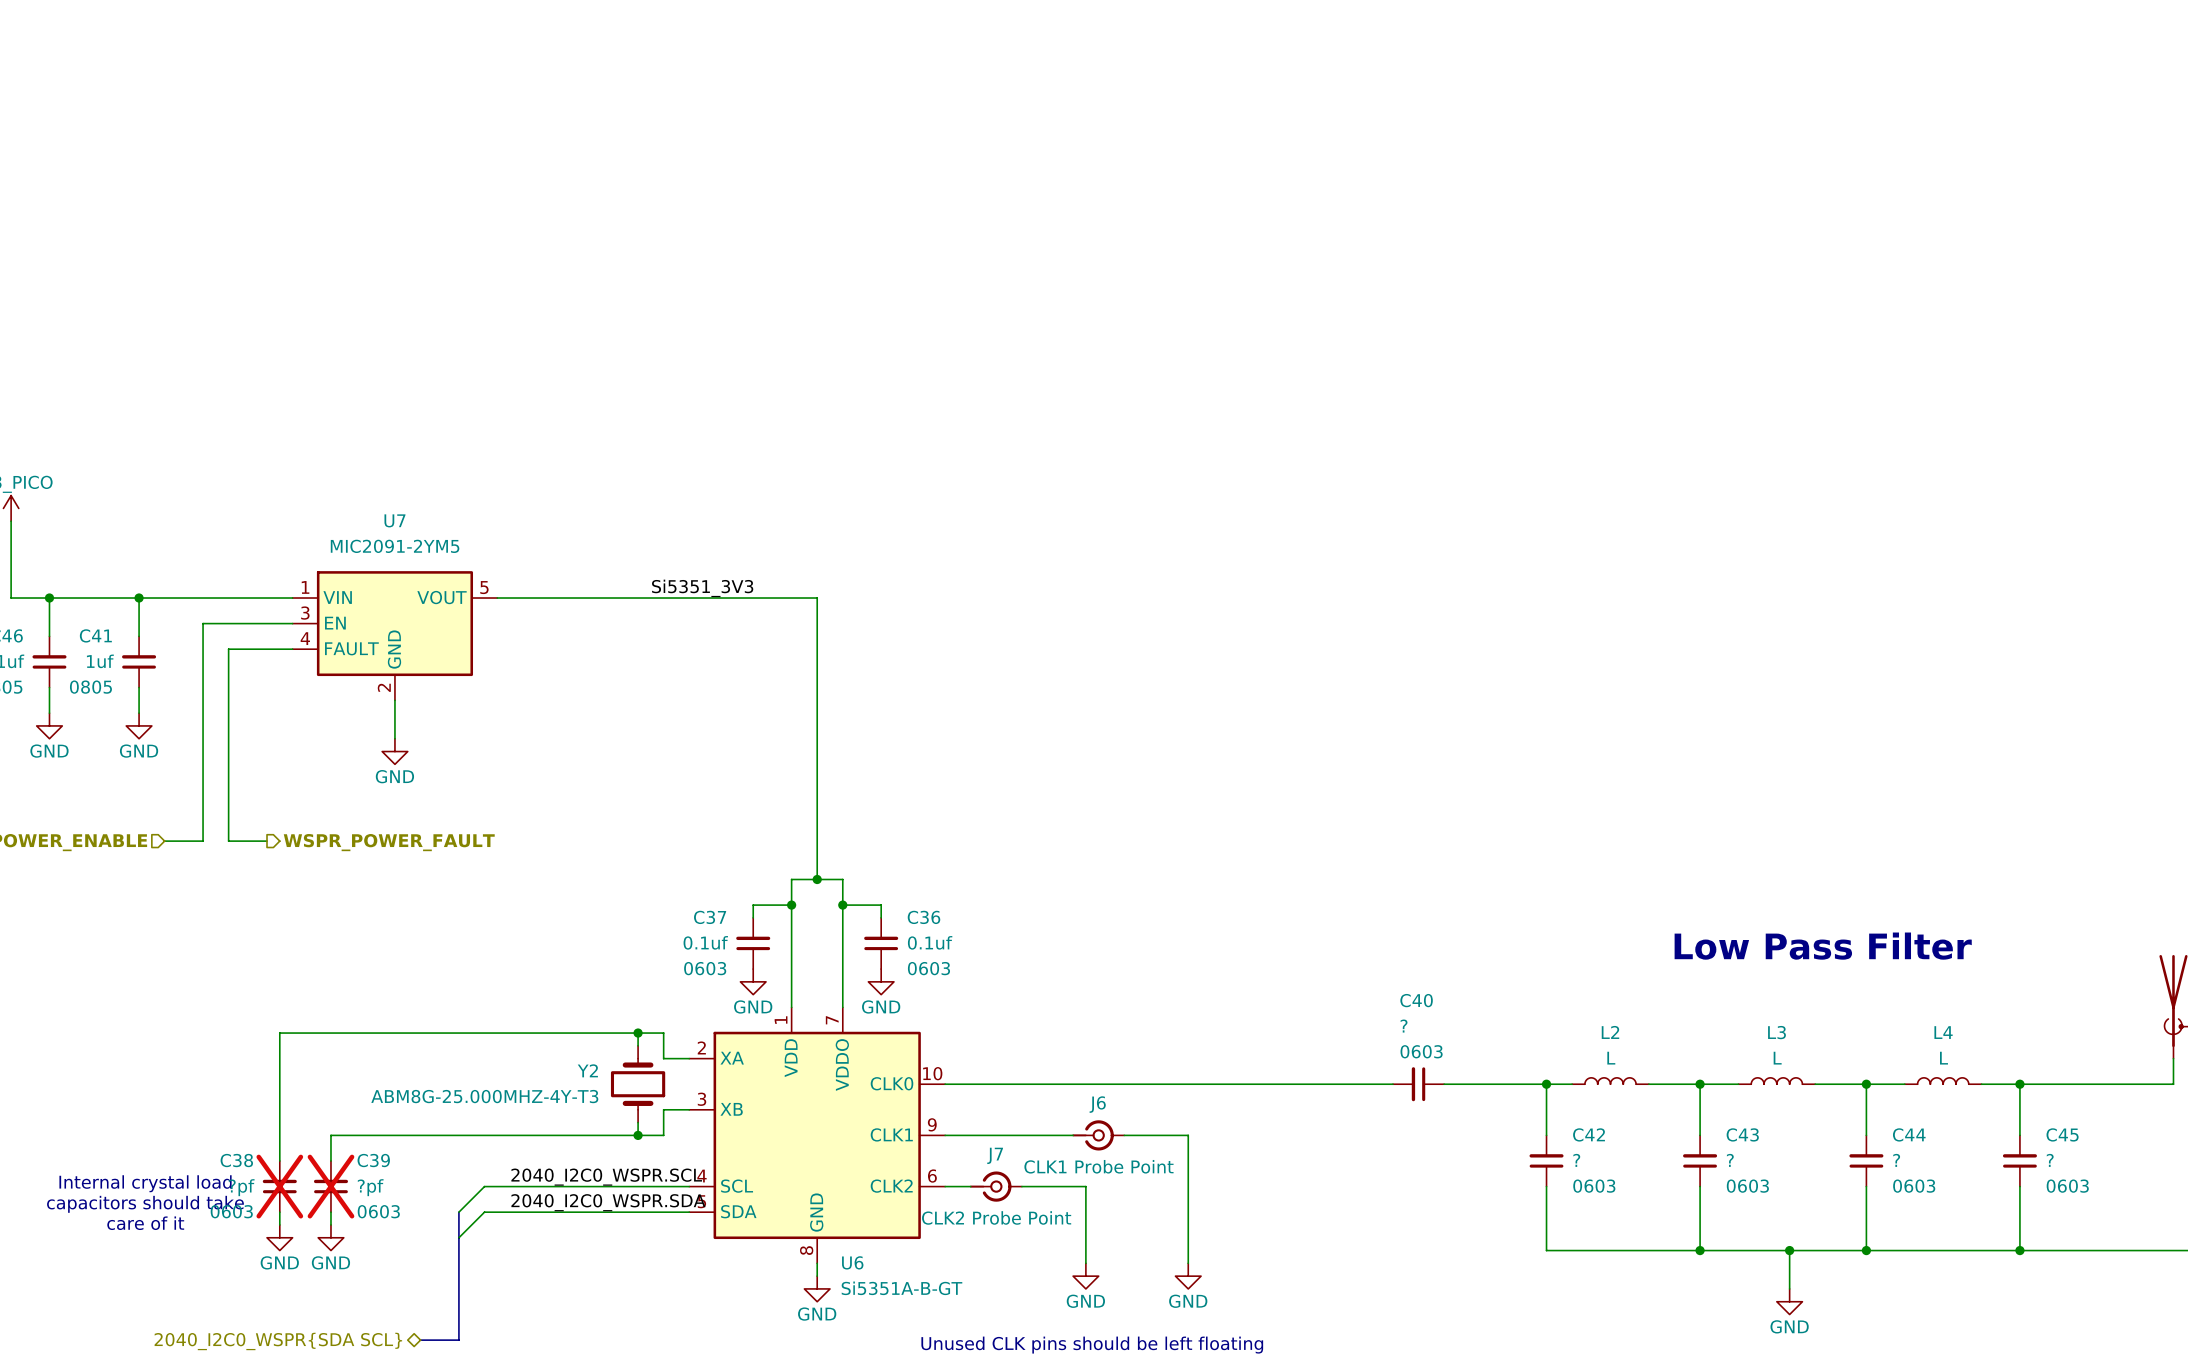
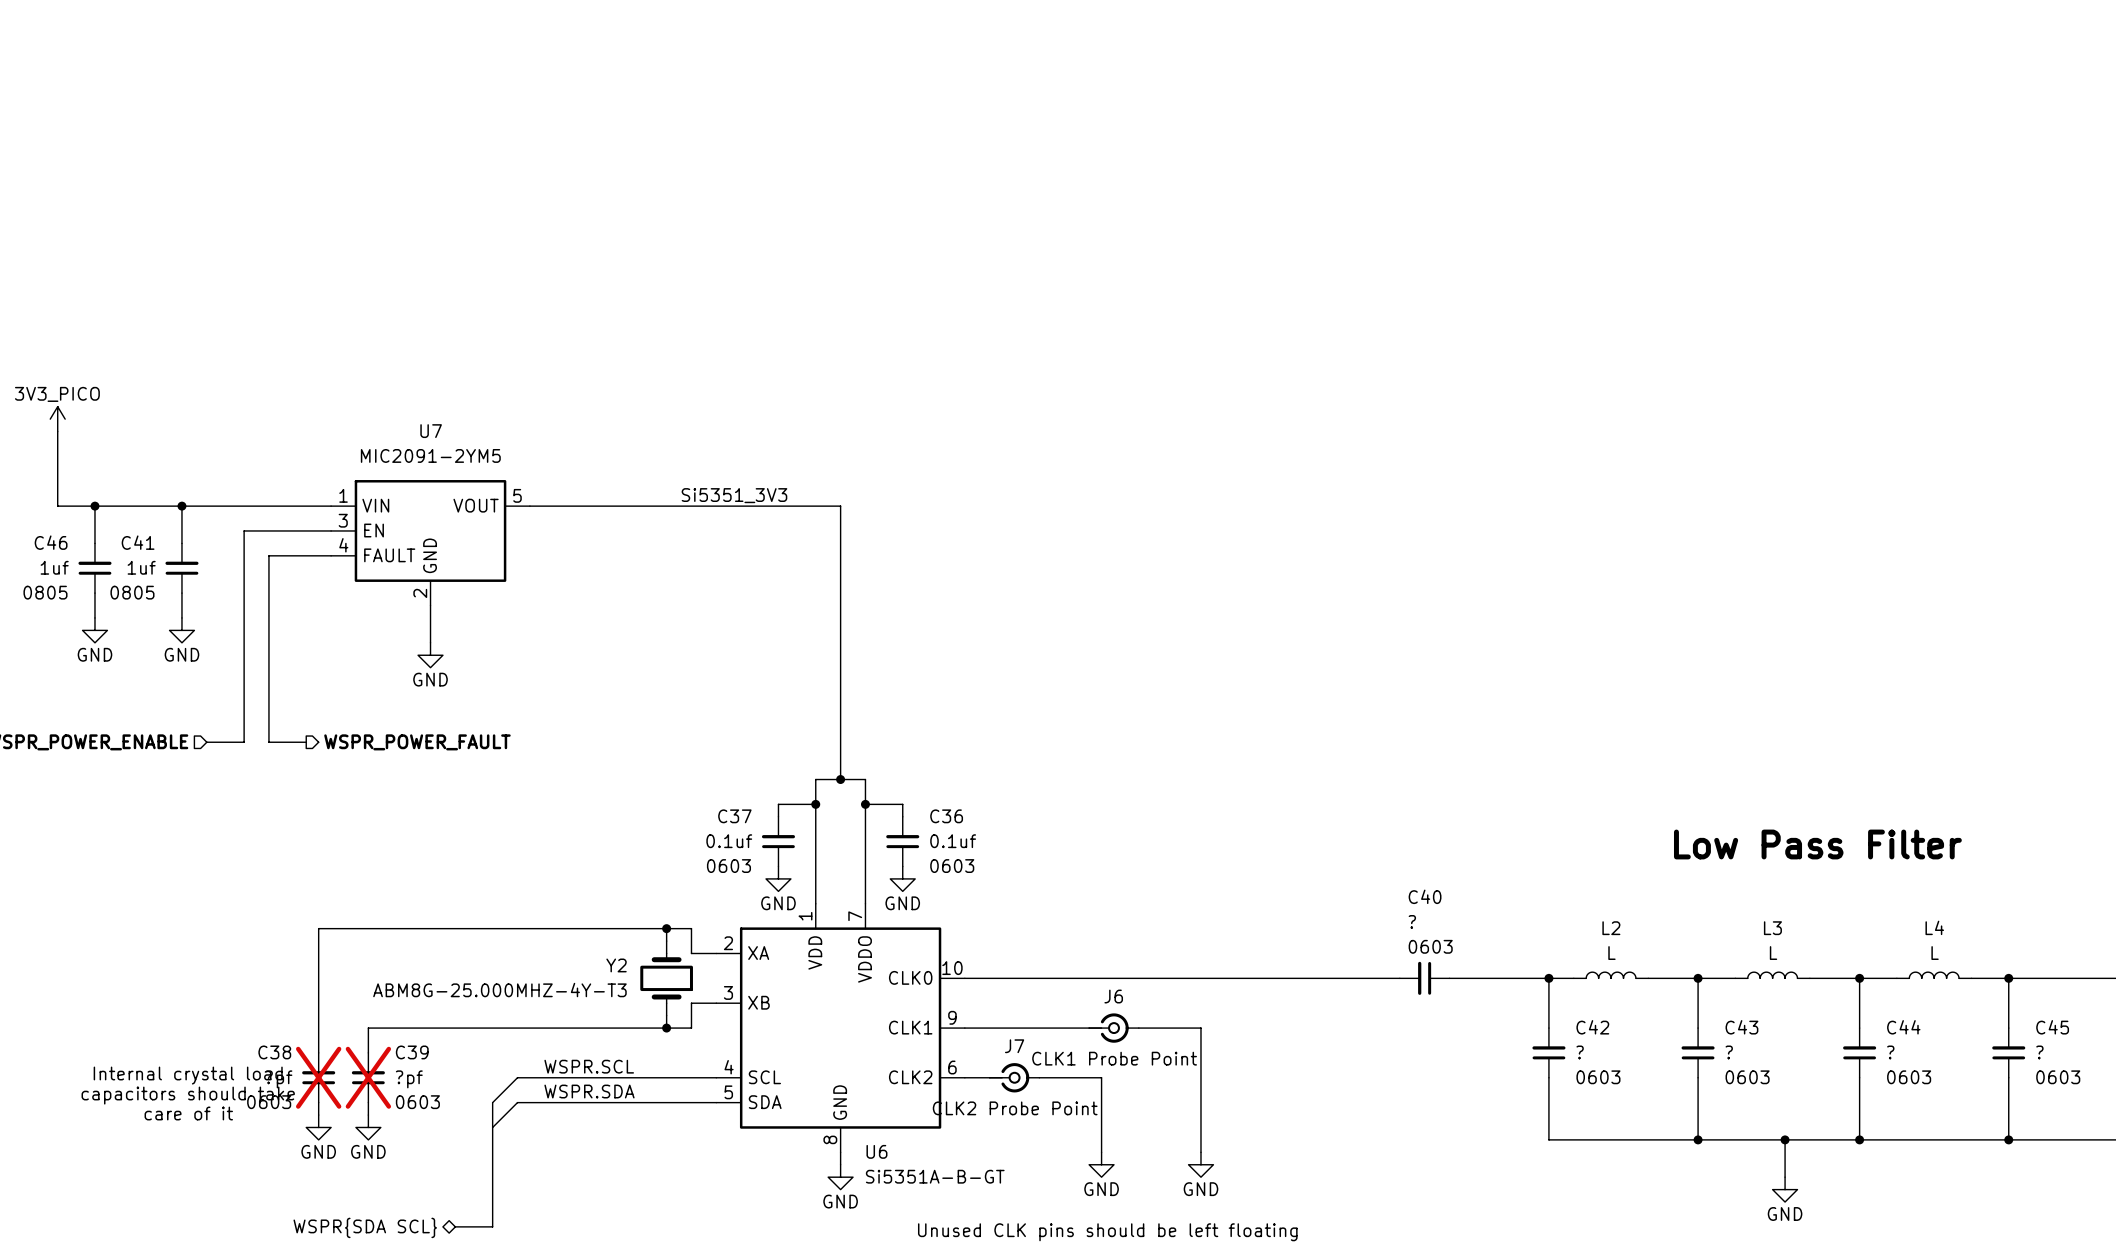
label: 2040_I2C0_WSPR.SCL (606, 1177) -> WSPR.SCL (589, 1066)
label: 2040_I2C0_WSPR.SDA (608, 1202) -> WSPR.SDA (589, 1091)
hierarchical label: 2040_I2C0_WSPR{SDA SCL} (278, 1341) -> WSPR{SDA SCL} (365, 1227)

